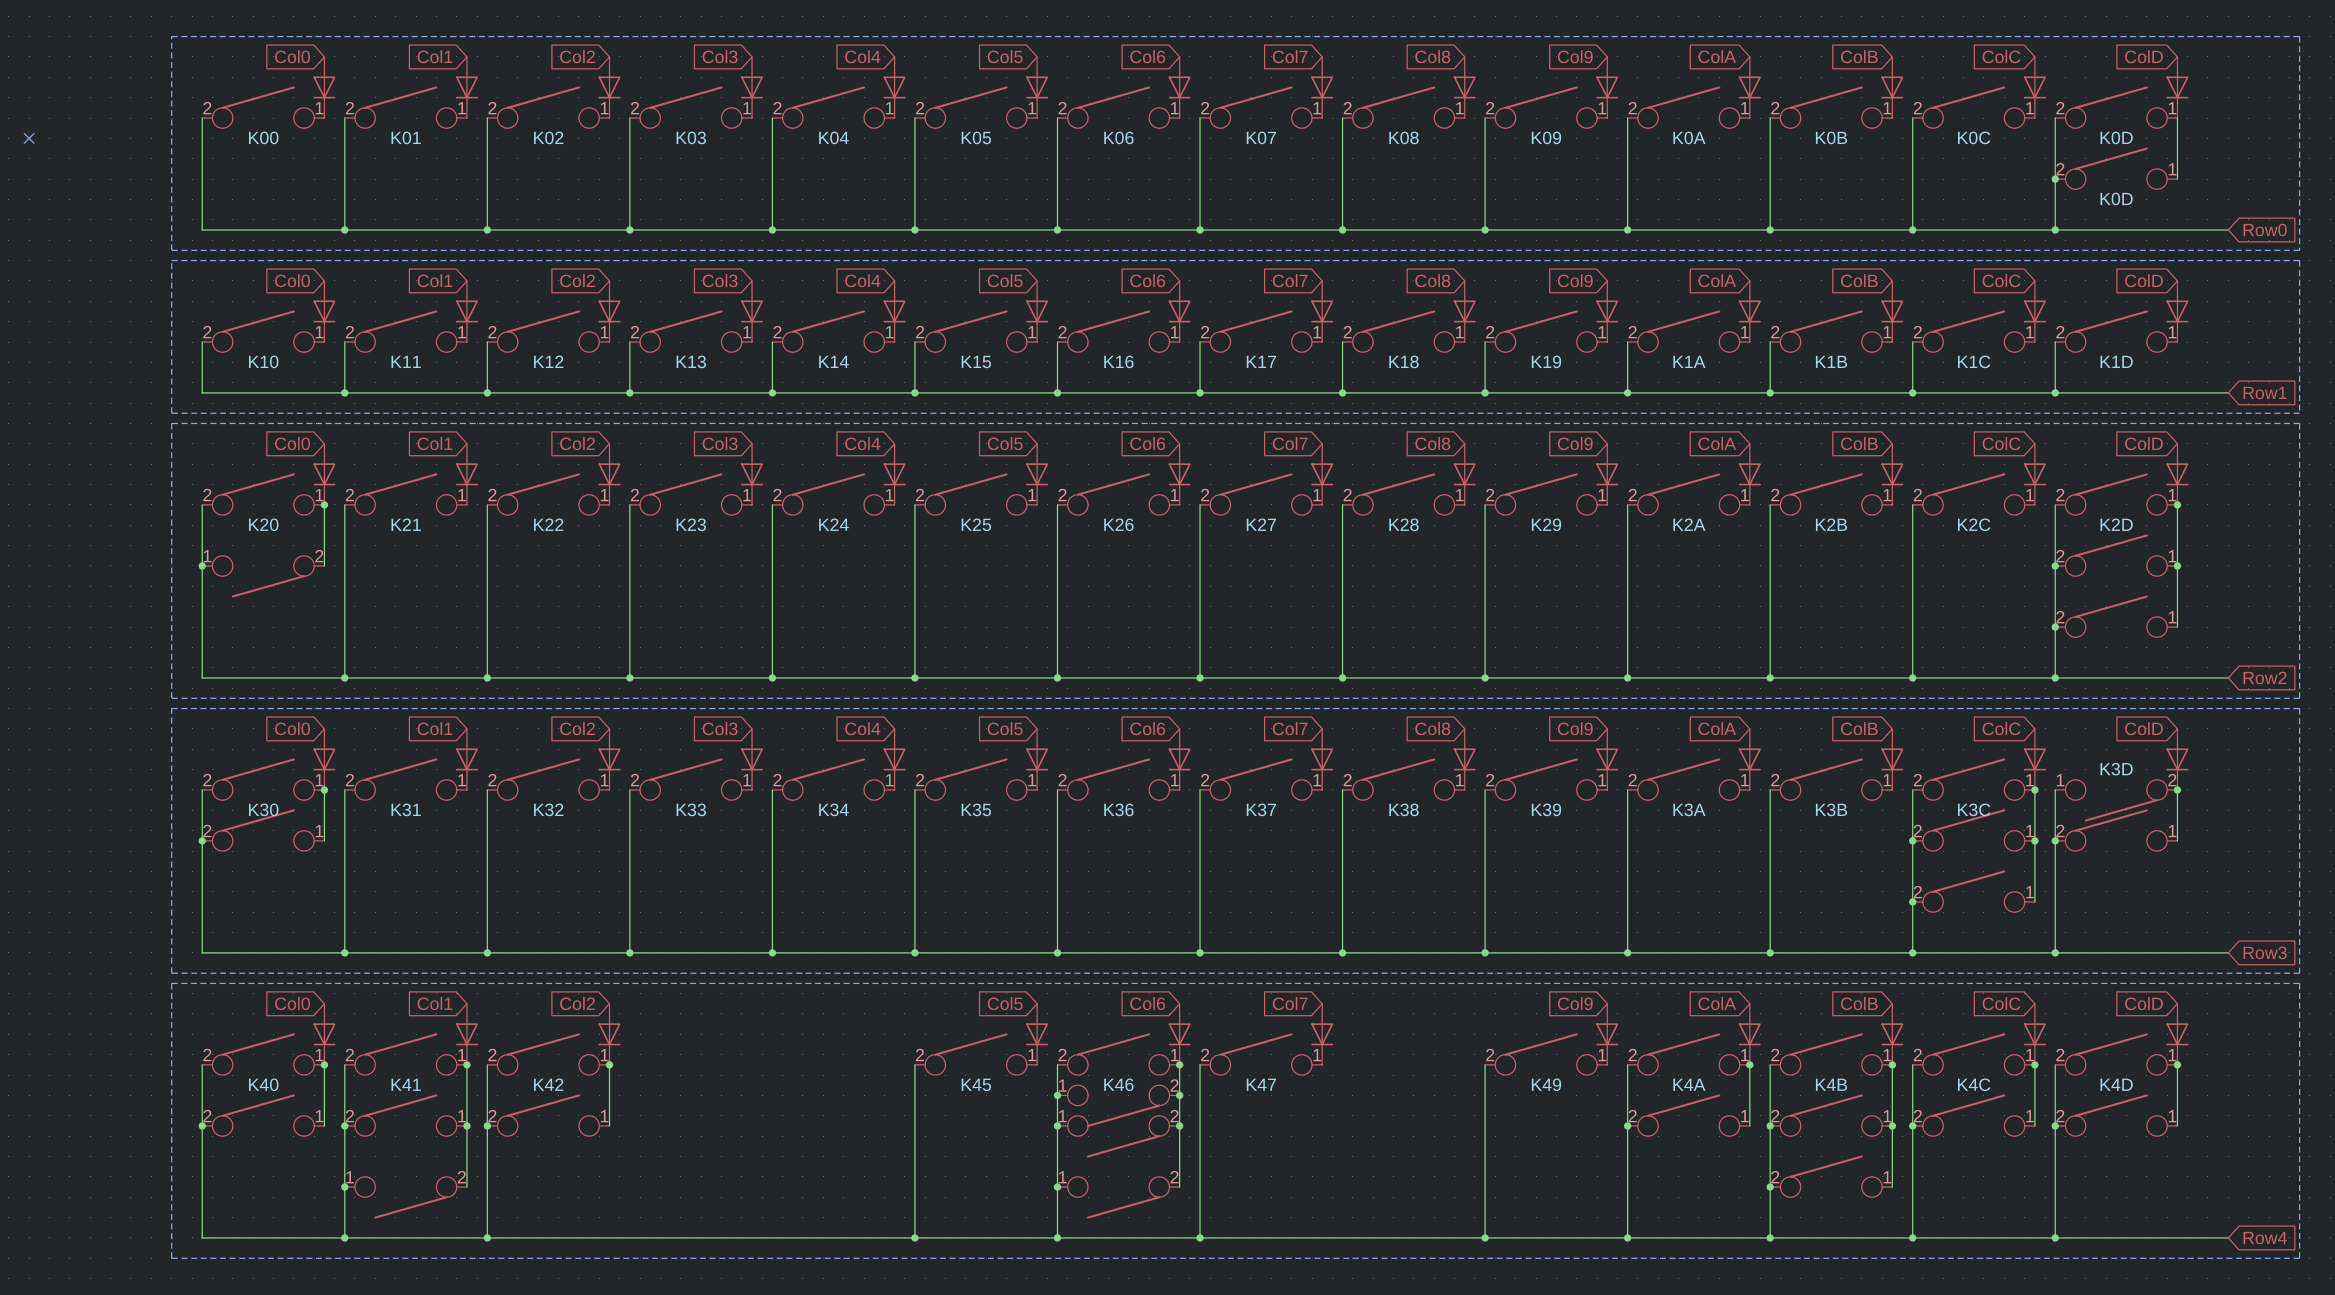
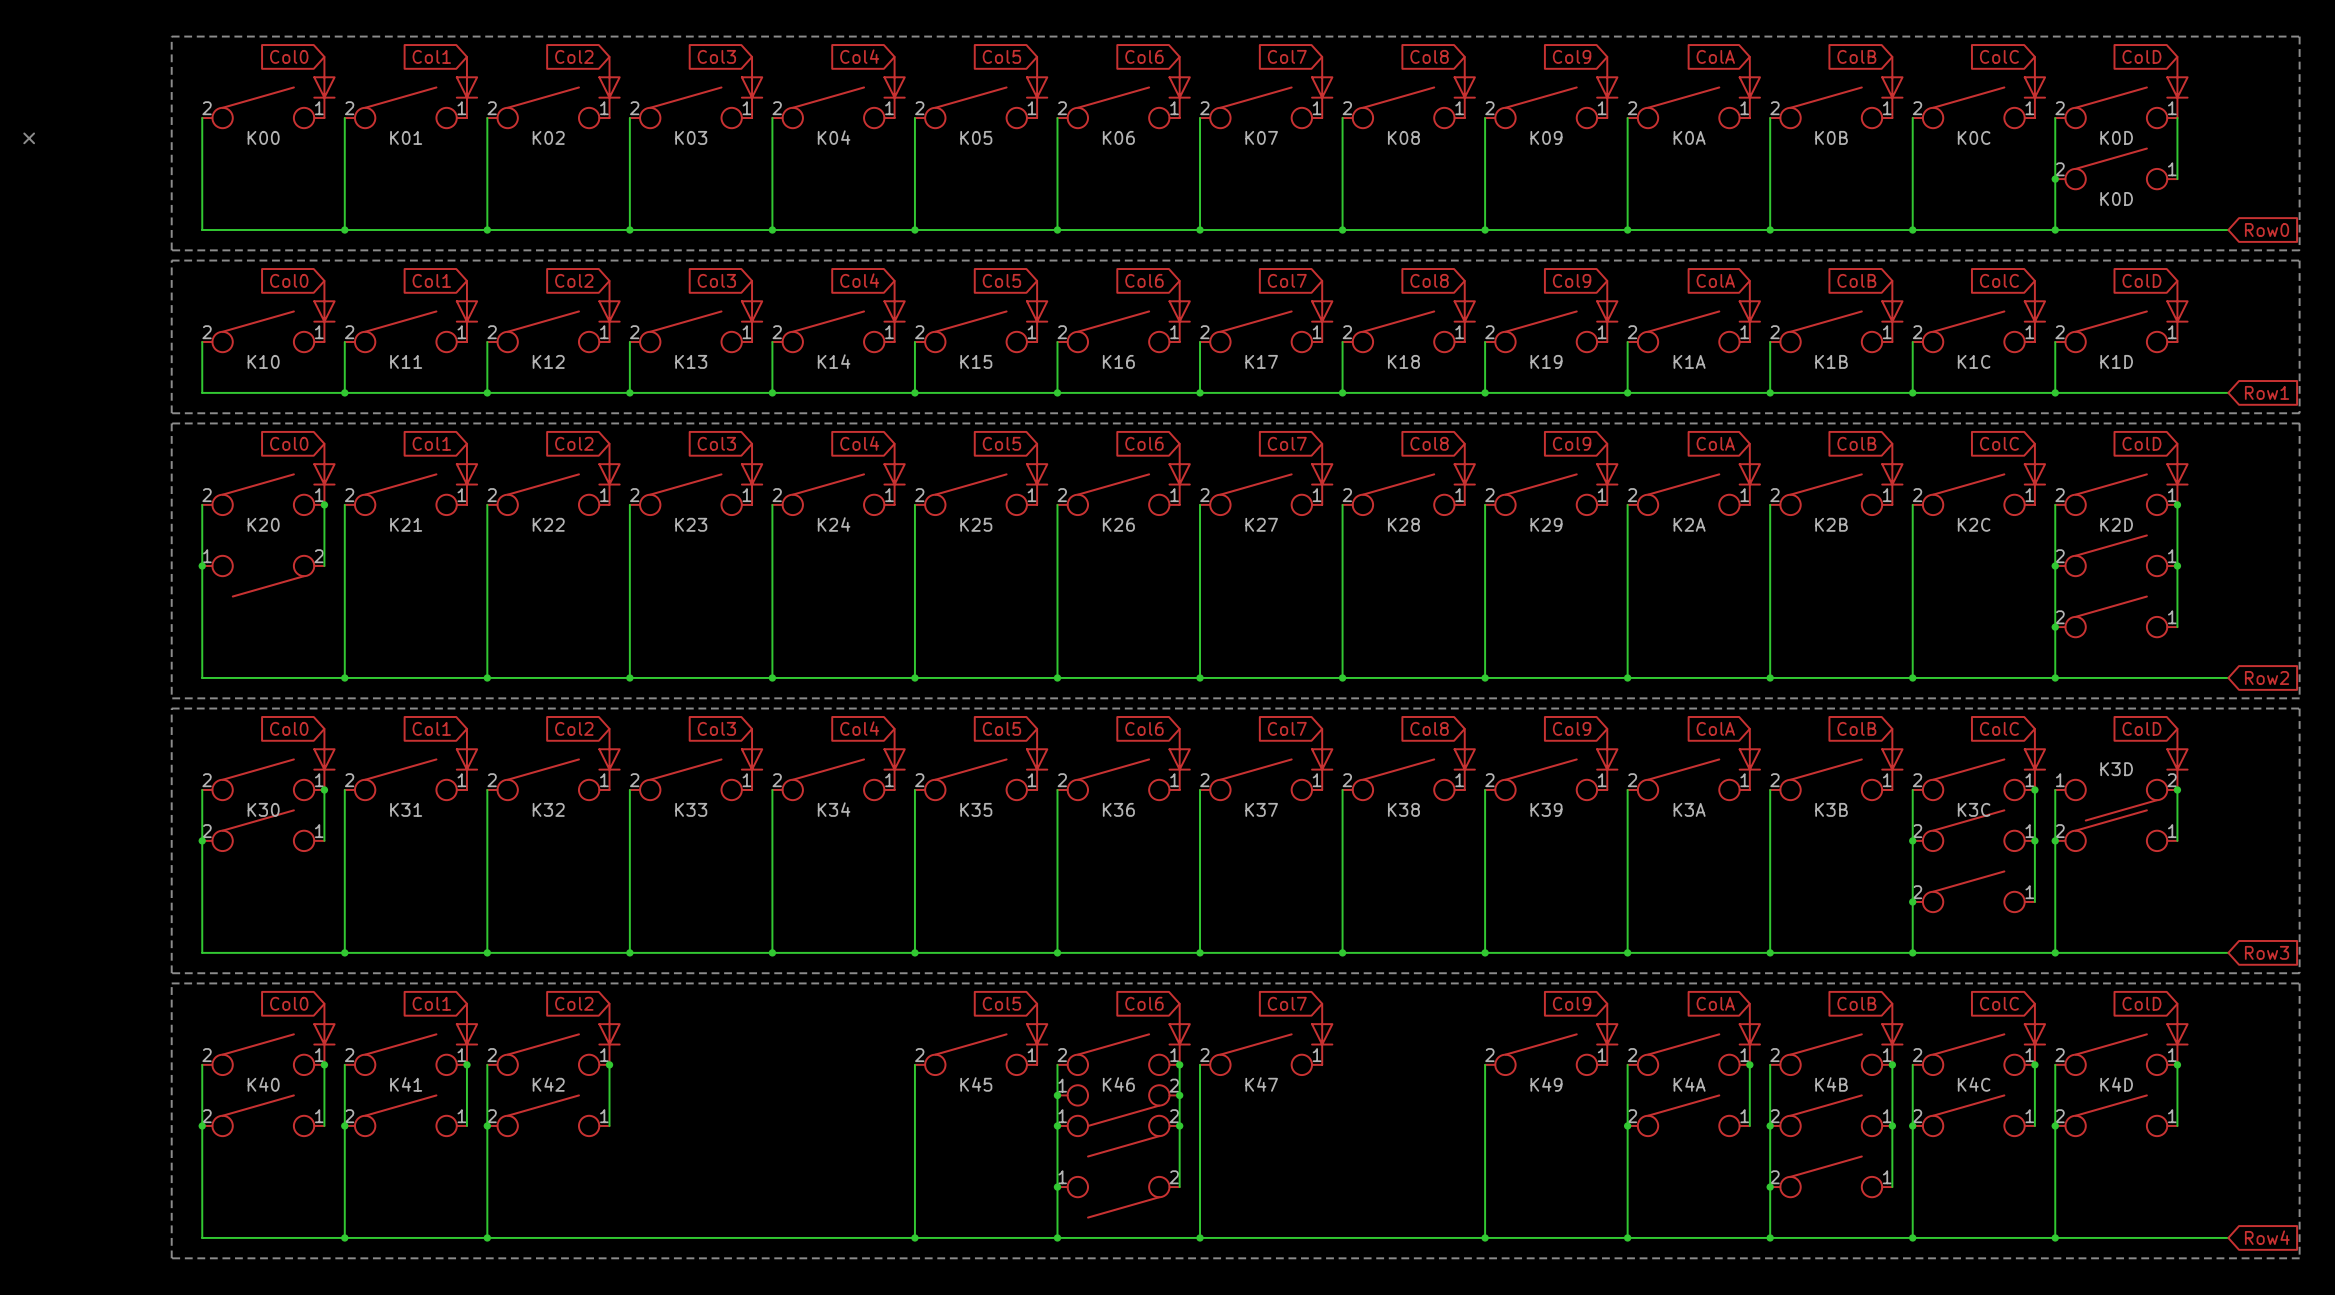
wire: (466, 1125) (466, 1187) -> none
junction: (466, 1125) -> none
junction: (344, 1187) -> none
part: (405, 1197) -> none

